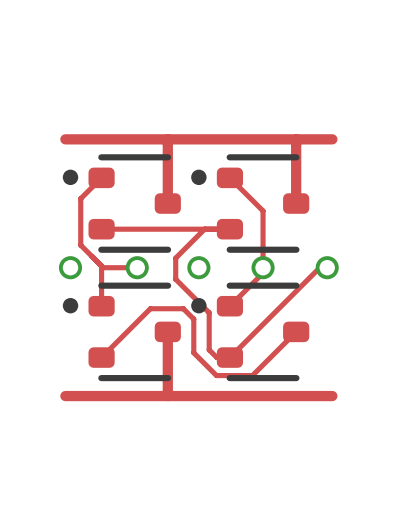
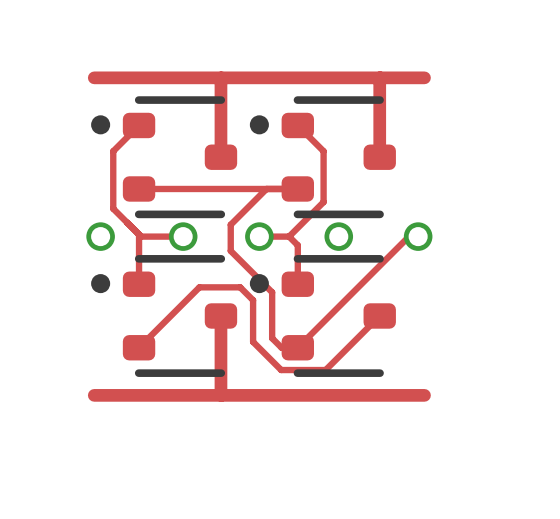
top track: (250, 198) (263, 210) (263, 273) (229, 306) -> (323, 151) (323, 202) (289, 236)
top track: none -> (259, 236) (289, 236)
top track: none -> (289, 236) (297, 245) (297, 284)

